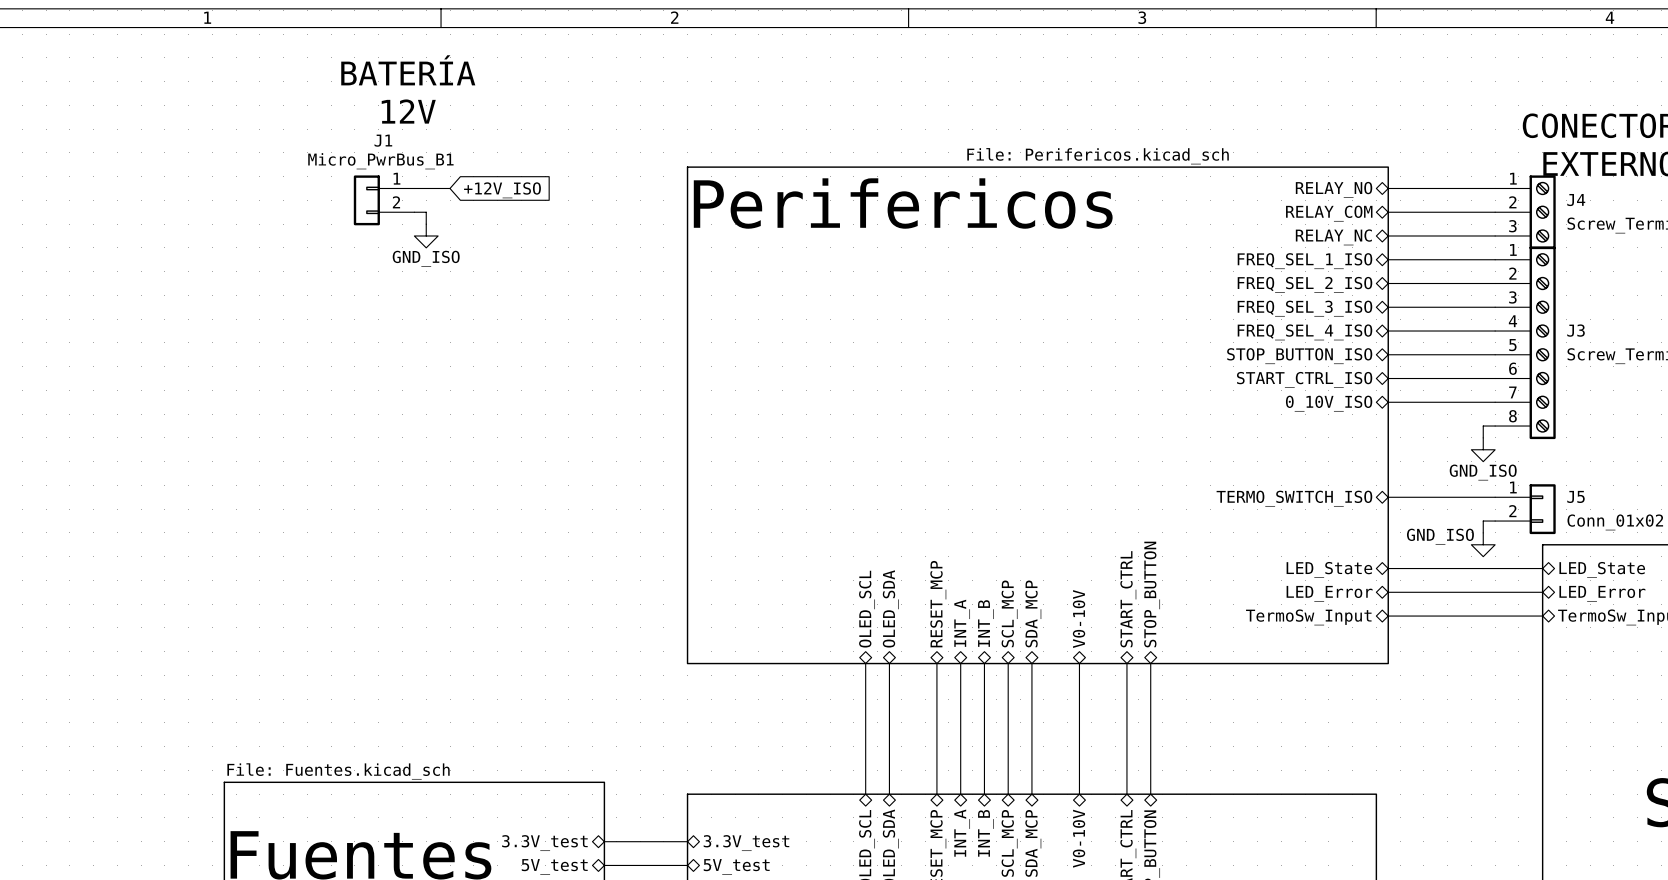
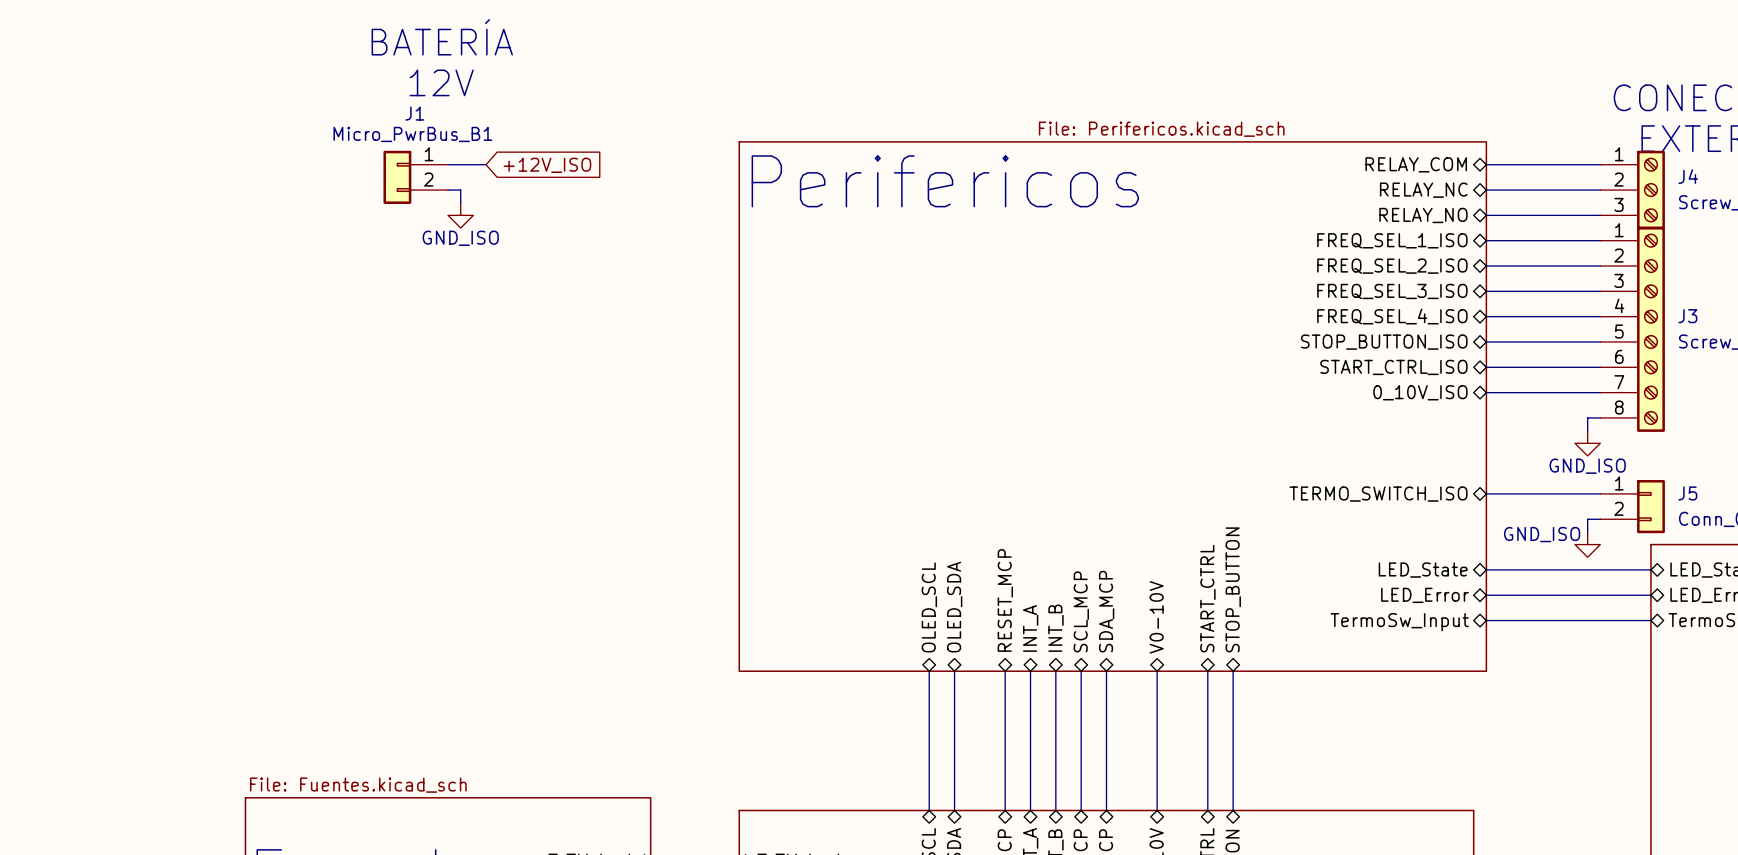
sheet pin: RELAY_NO (1334, 189) -> RELAY_COM (1416, 164)
sheet pin: RELAY_COM (1329, 213) -> RELAY_NC (1423, 190)
sheet pin: RELAY_NC (1333, 237) -> RELAY_NO (1423, 215)

